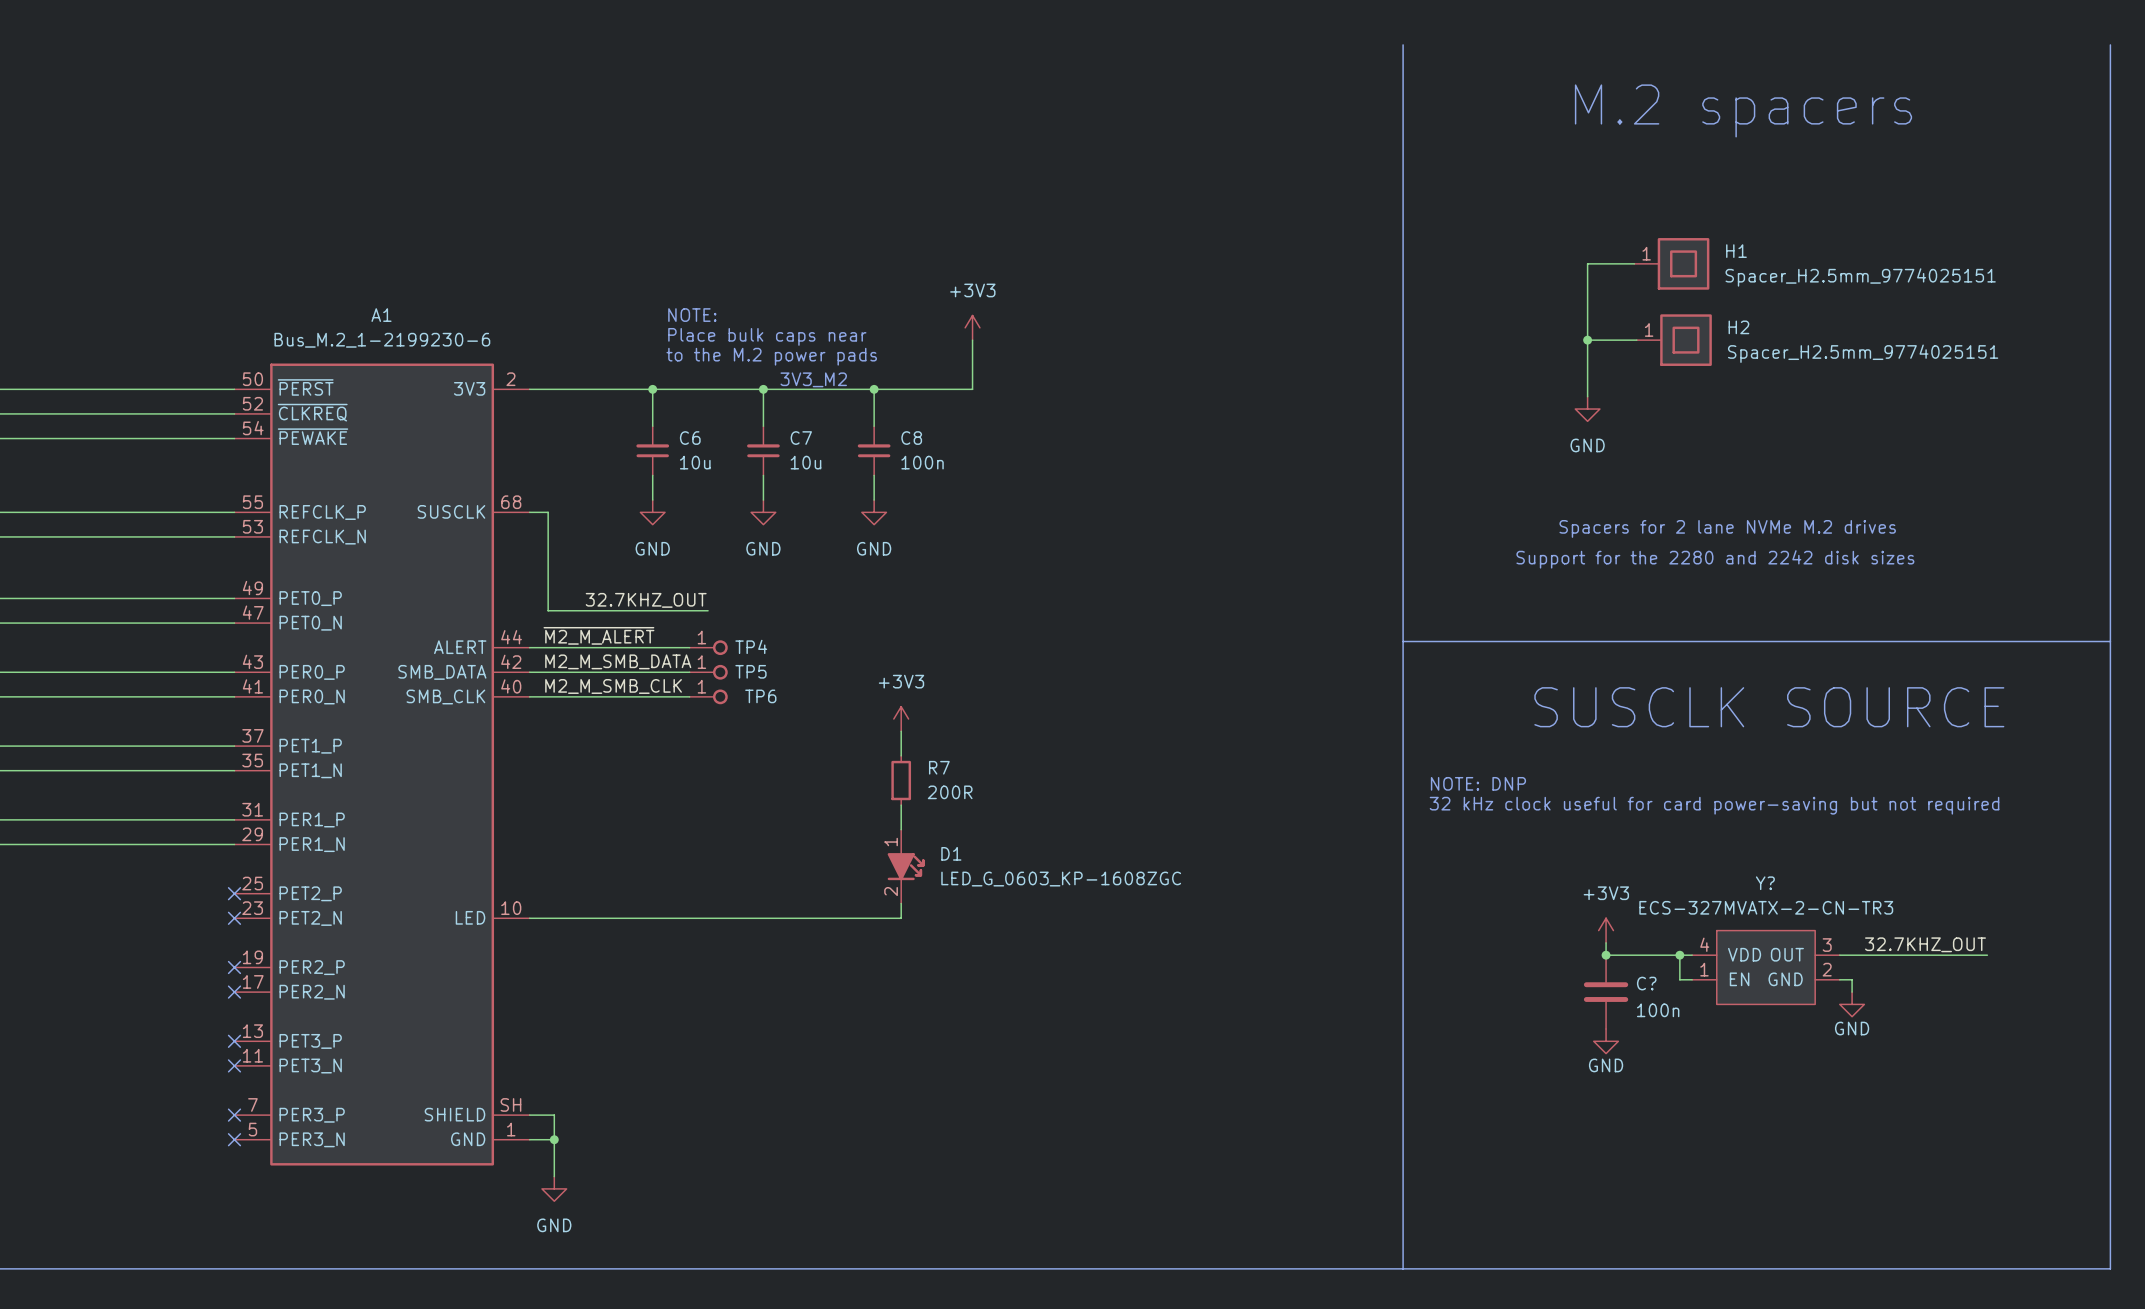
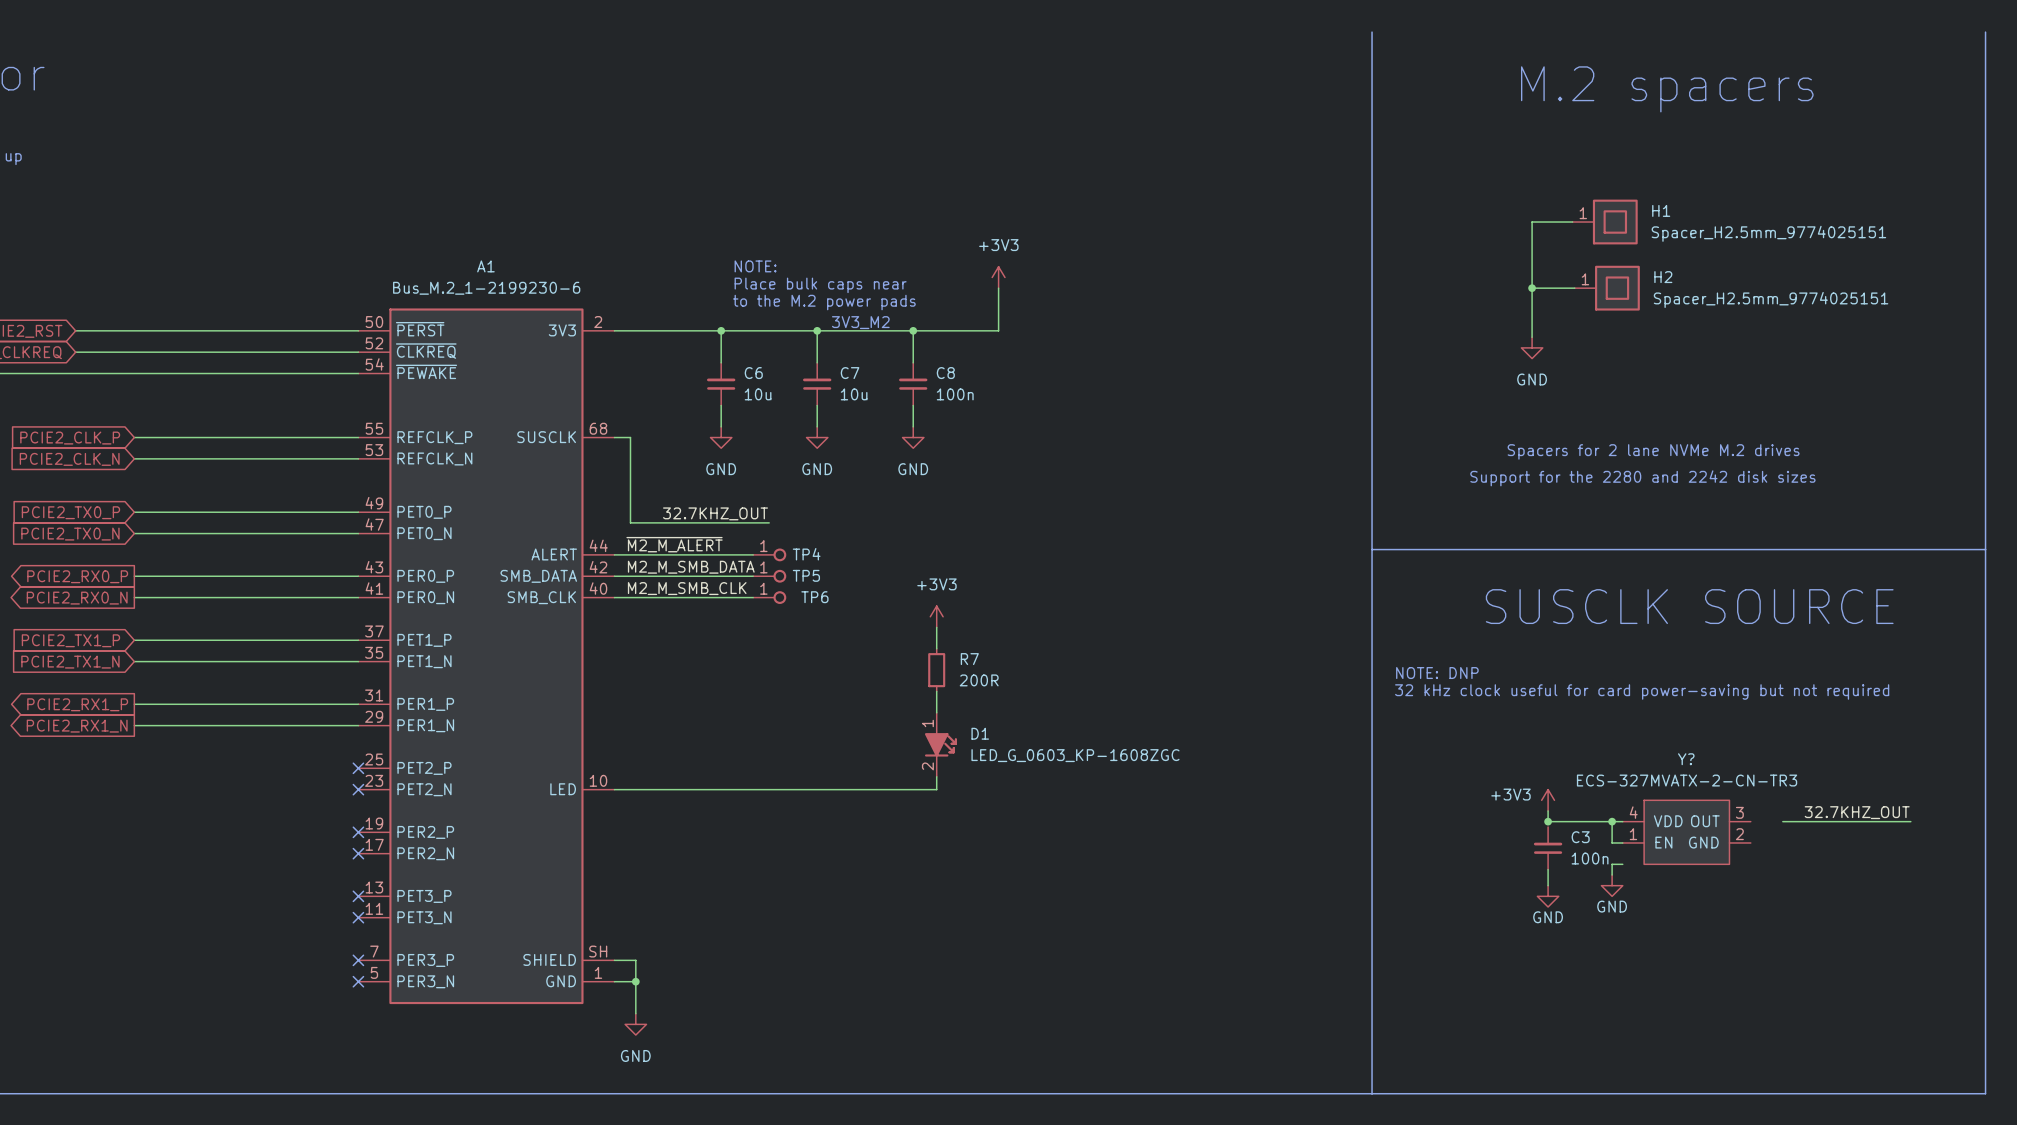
power symbol text position: +3V3 (1606, 893) -> +3V3 (1510, 794)
label position: 32.7KHZ_OUT (1925, 944) -> 32.7KHZ_OUT (1857, 812)
wire: (1839, 955) (1876, 955) -> (1878, 821) (1910, 821)
wire: (1839, 979) (1852, 979) (1852, 992) -> none
C3: none -> (1548, 848)
C?: (1606, 992) -> none
wire: none -> (1622, 864) (1612, 864) (1612, 874)
power symbol position: GND (1852, 1004) -> GND (1612, 885)

